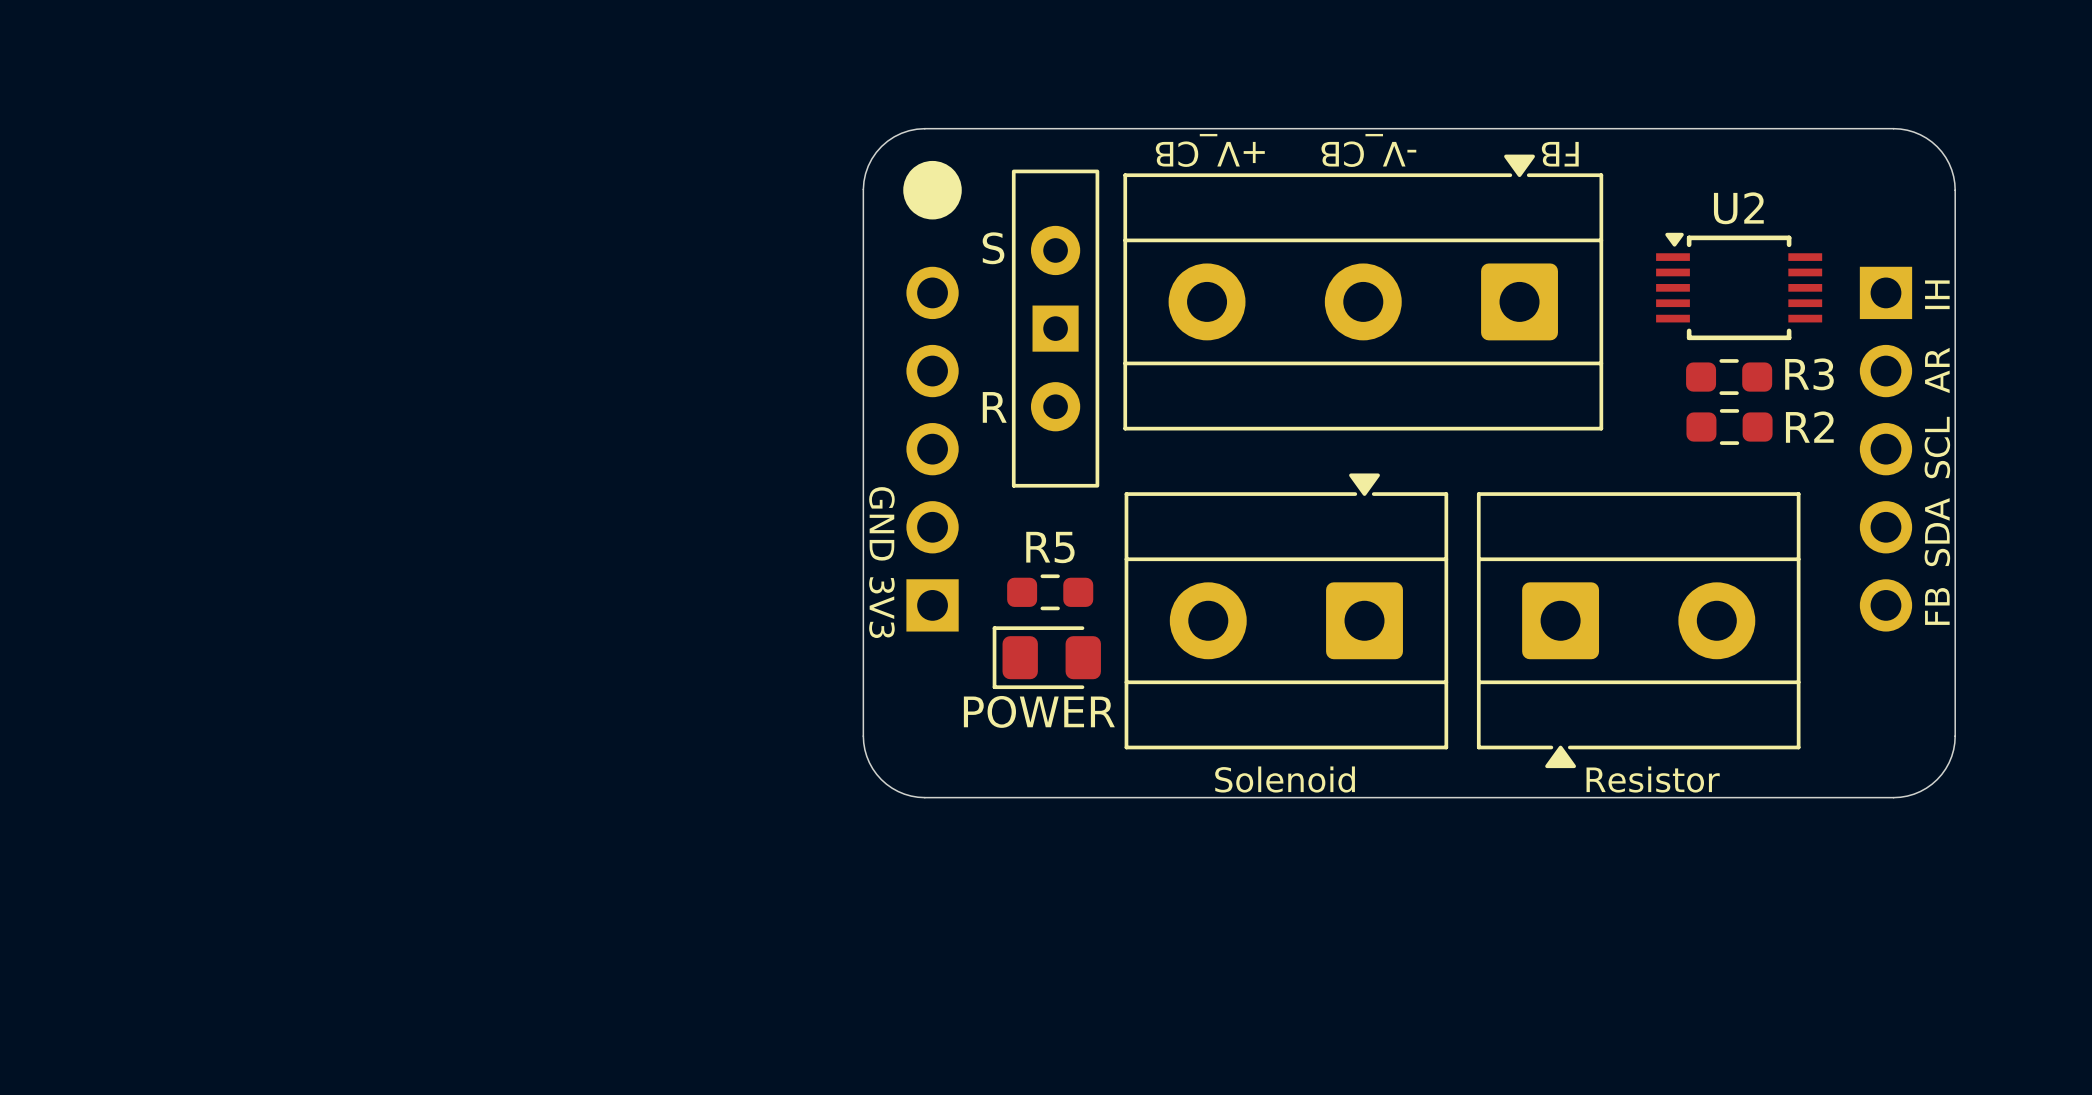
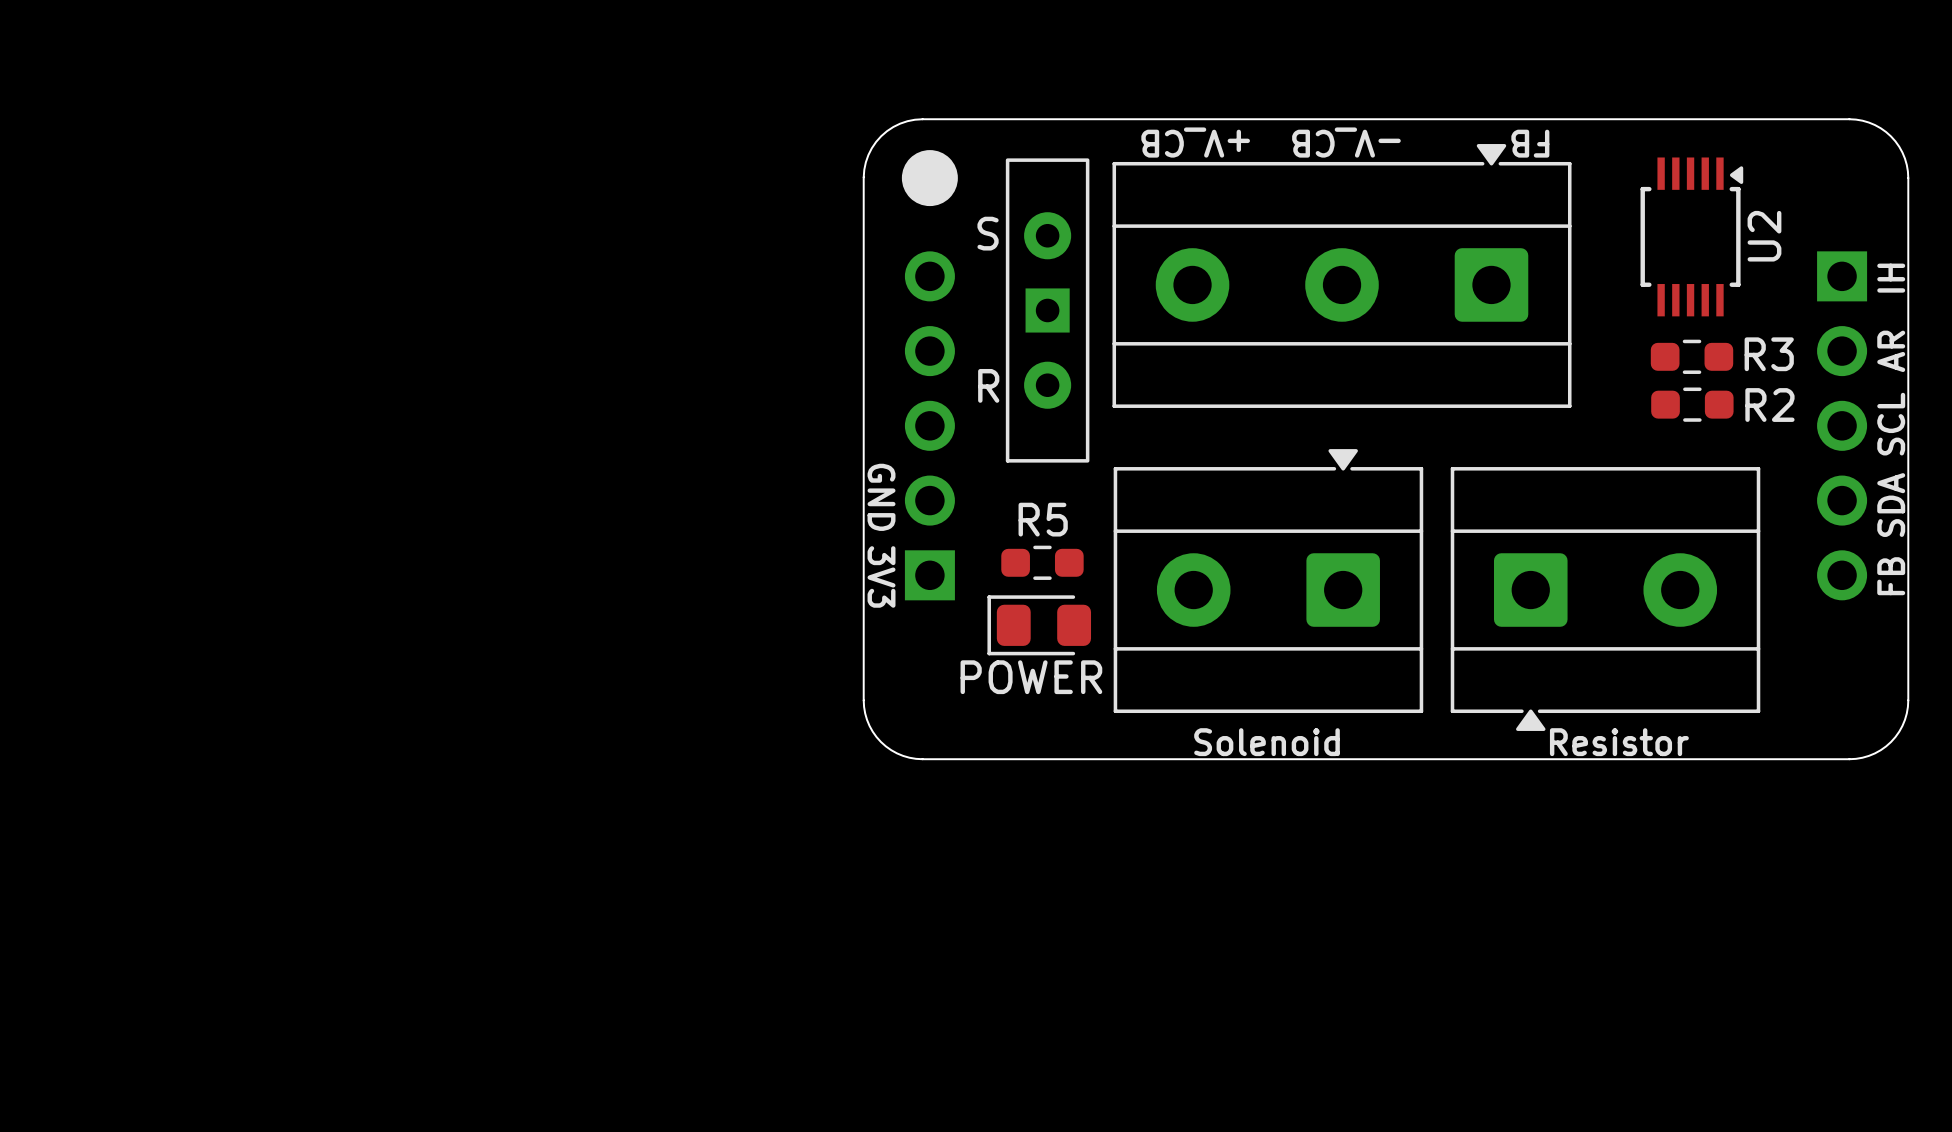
U2 rotation: 0° (1739, 286) -> 90° clockwise (1691, 236)

